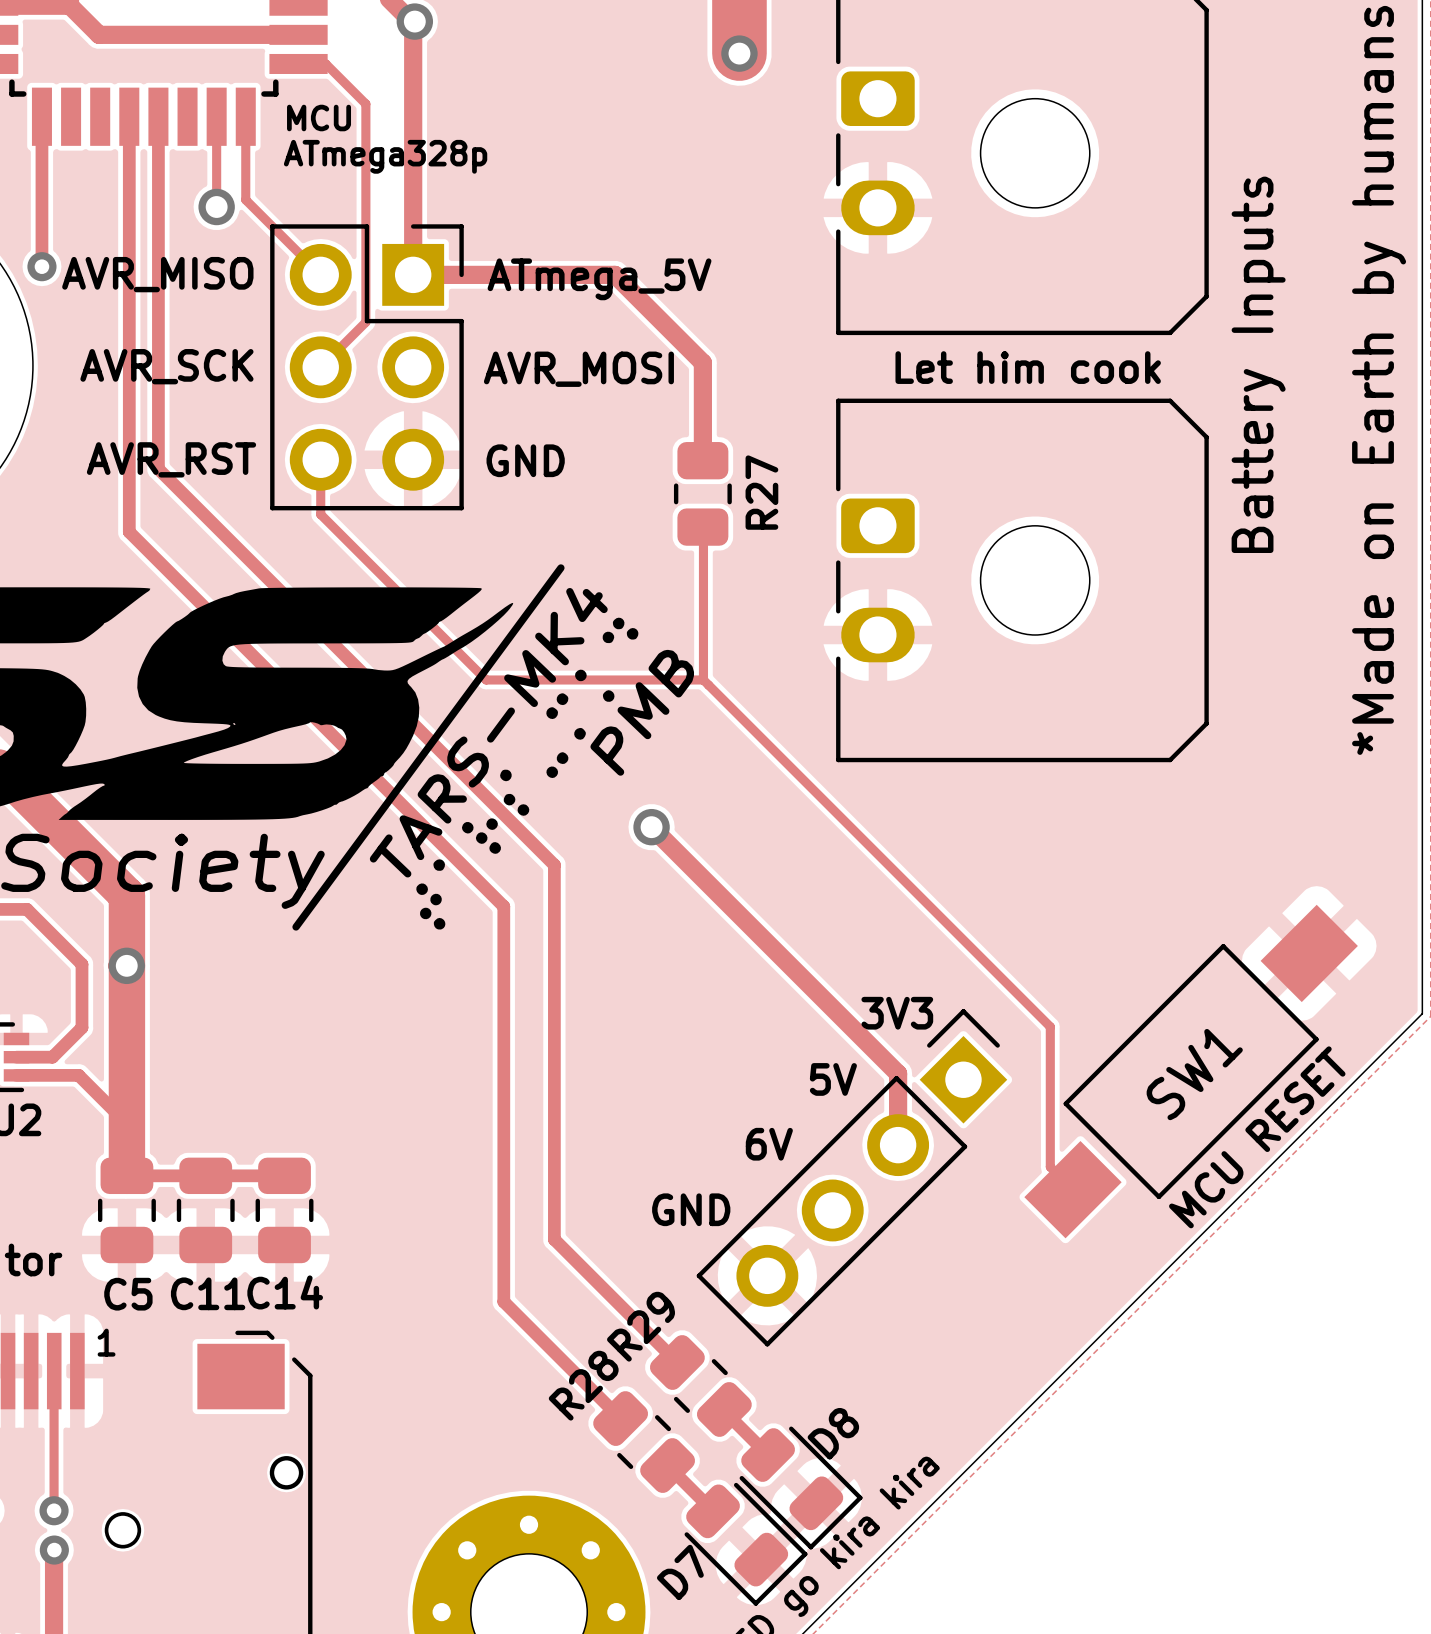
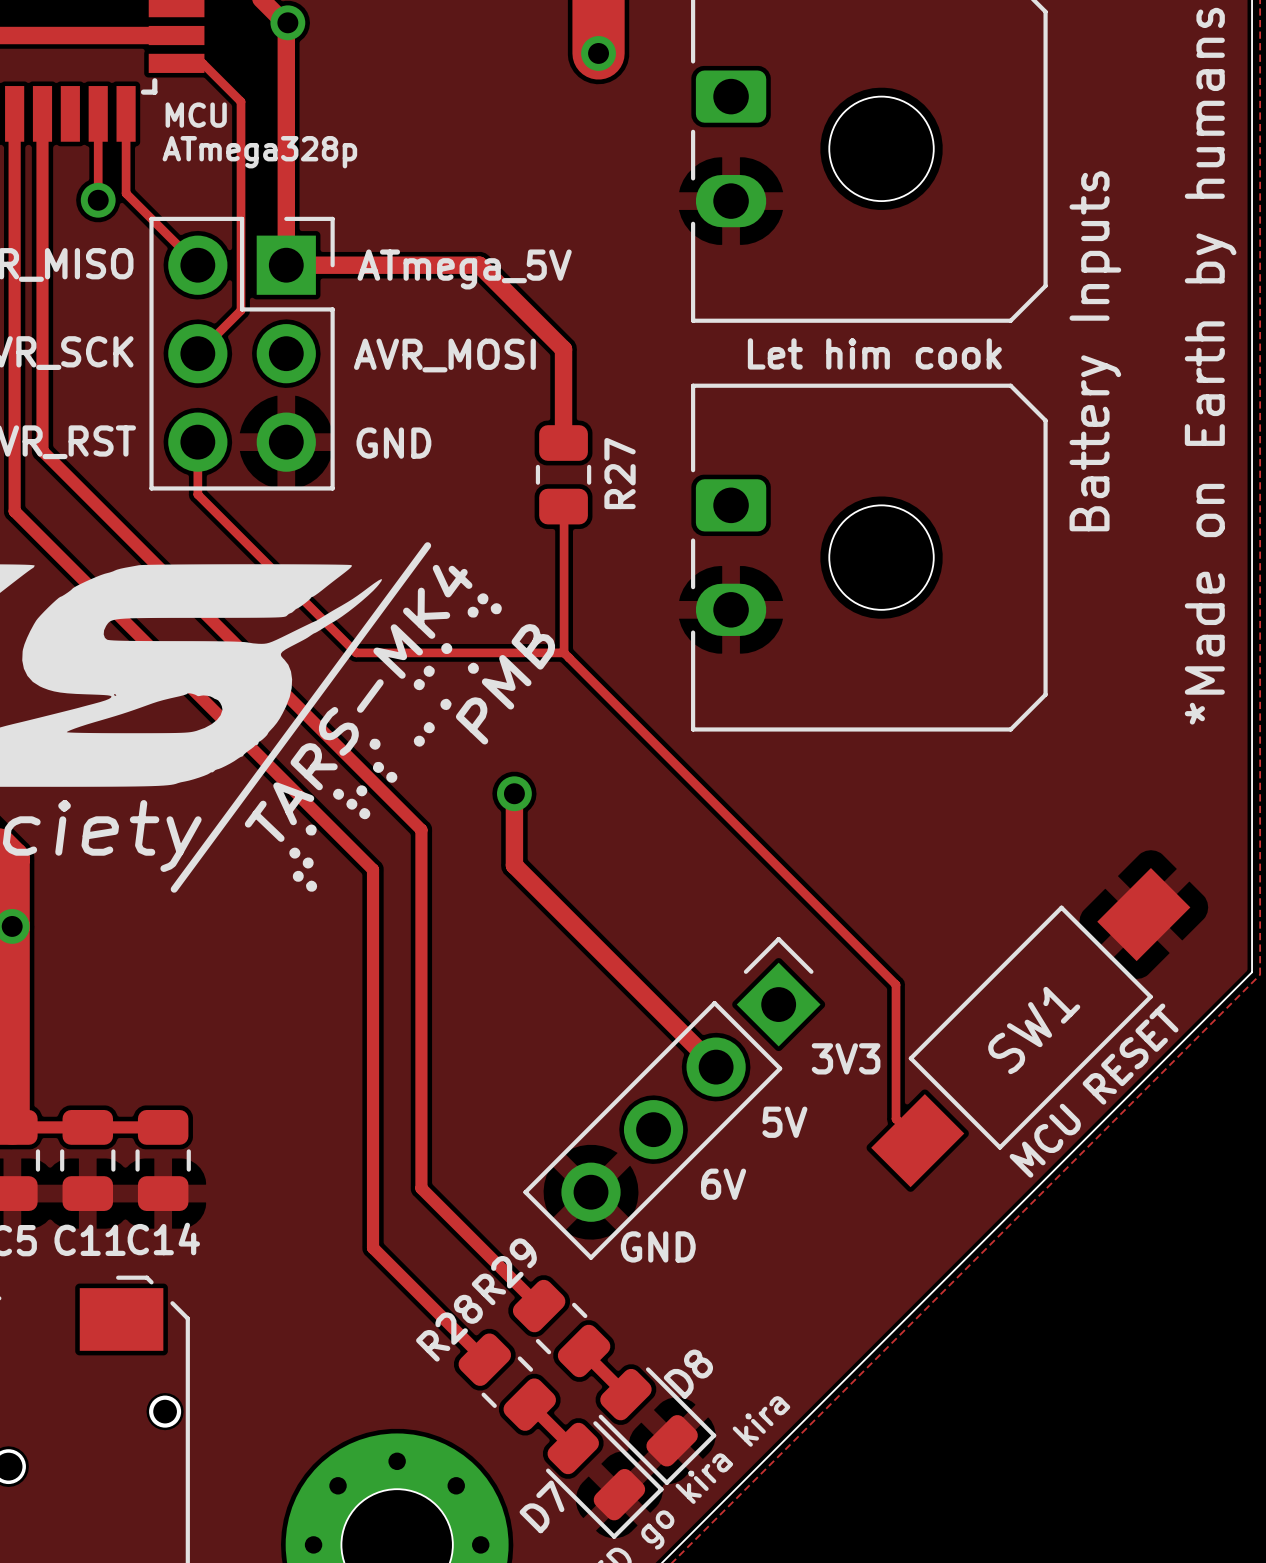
track: (651, 827) (898, 1073) (898, 1145) -> (514, 793) (514, 865) (716, 1067)
text position: 3V3 (897, 1013) -> 3V3 (846, 1058)
text position: 5V (833, 1079) -> 5V (784, 1122)
text position: 6V (769, 1144) -> 6V (723, 1184)
part position: (851, 1177) -> (671, 1098)
text position: GND (691, 1209) -> GND (658, 1246)

